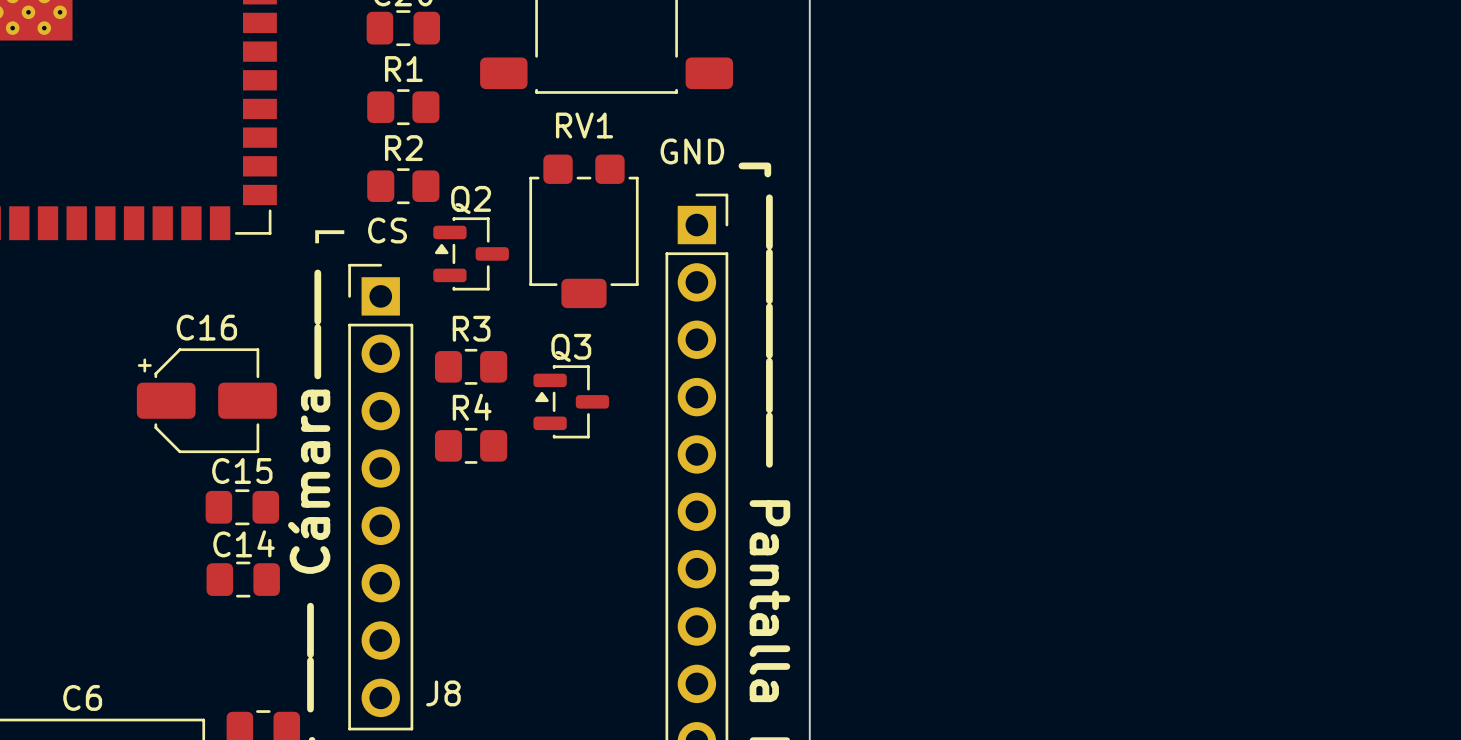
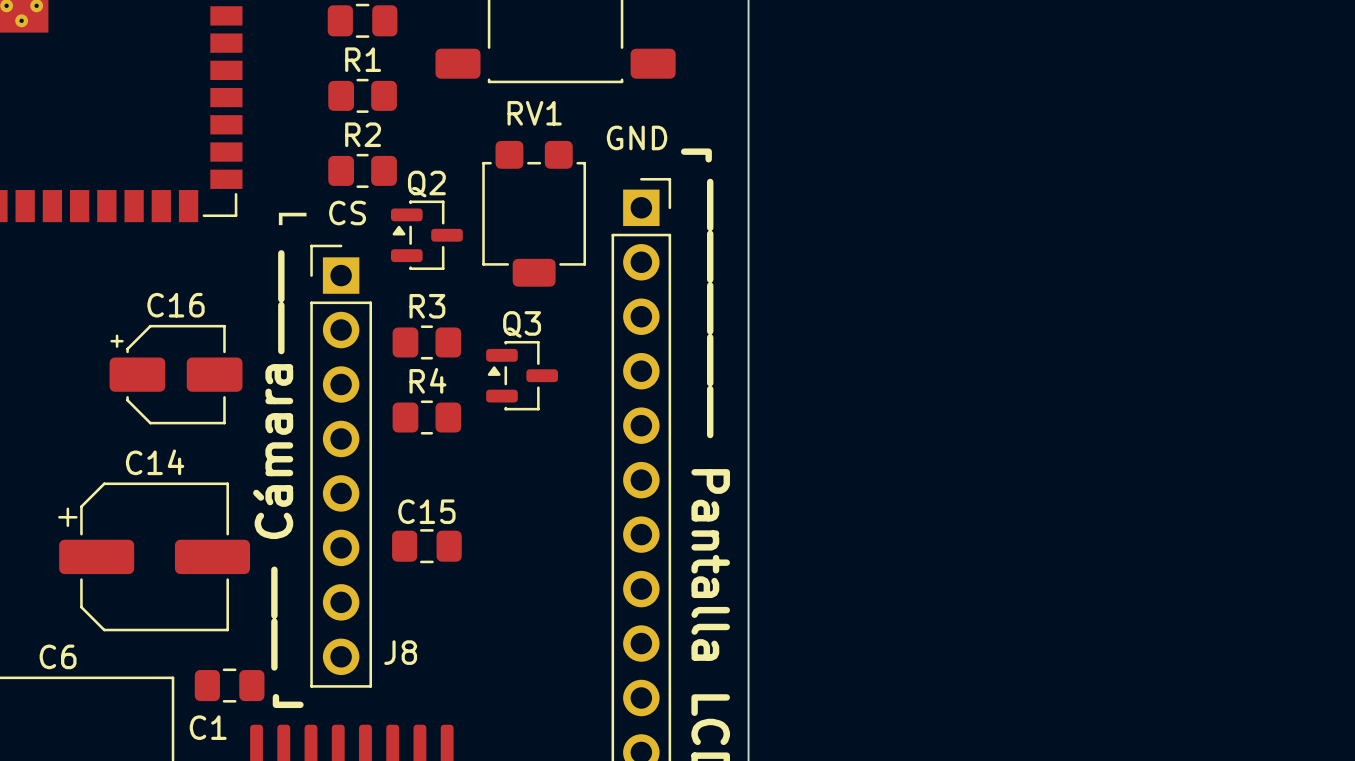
C15 position: (242, 507) -> (426, 546)
C14 name position: C14 (244, 543) -> C14 (155, 462)
C14 footprint: [206, 561, 280, 598] -> [58, 482, 251, 632]

